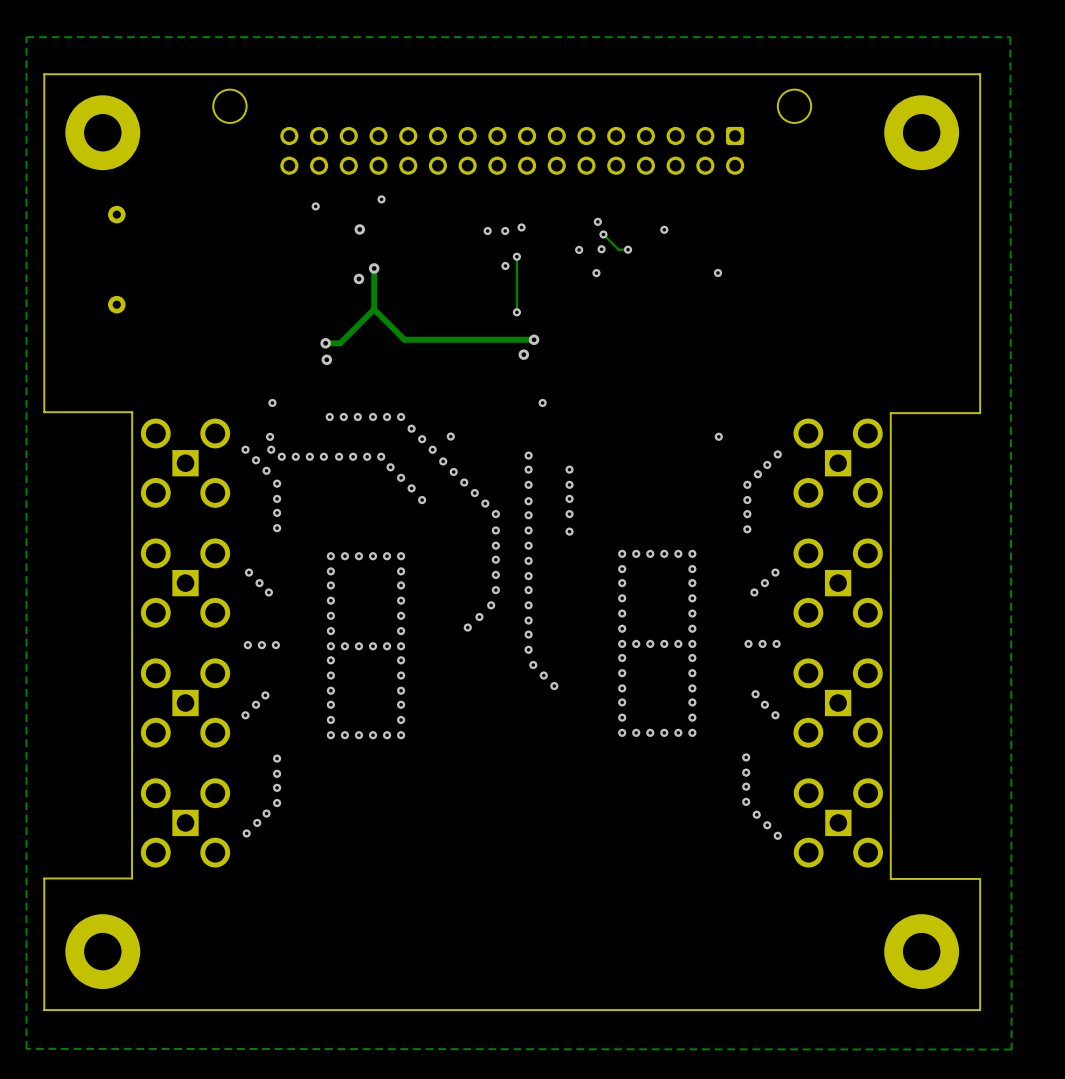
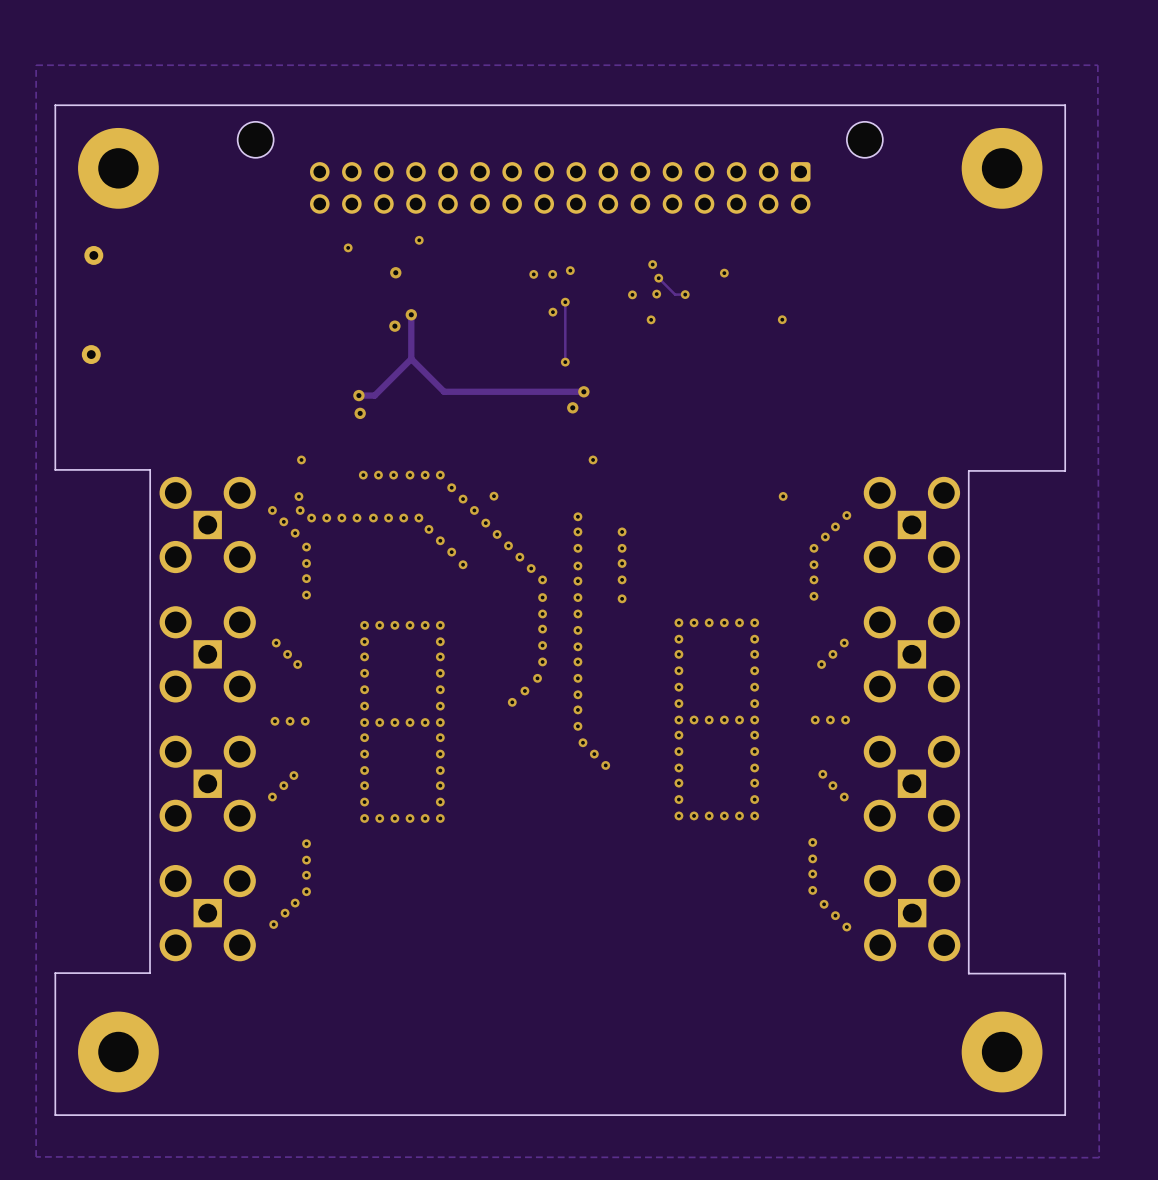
part position: (116, 214) -> (93, 255)
part position: (116, 304) -> (91, 354)

